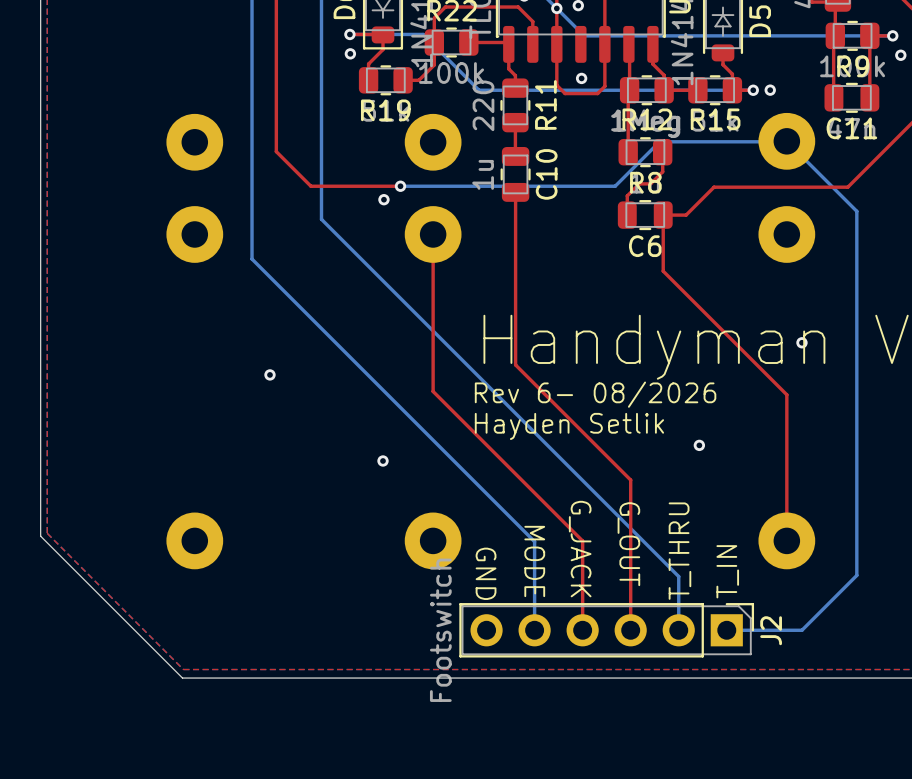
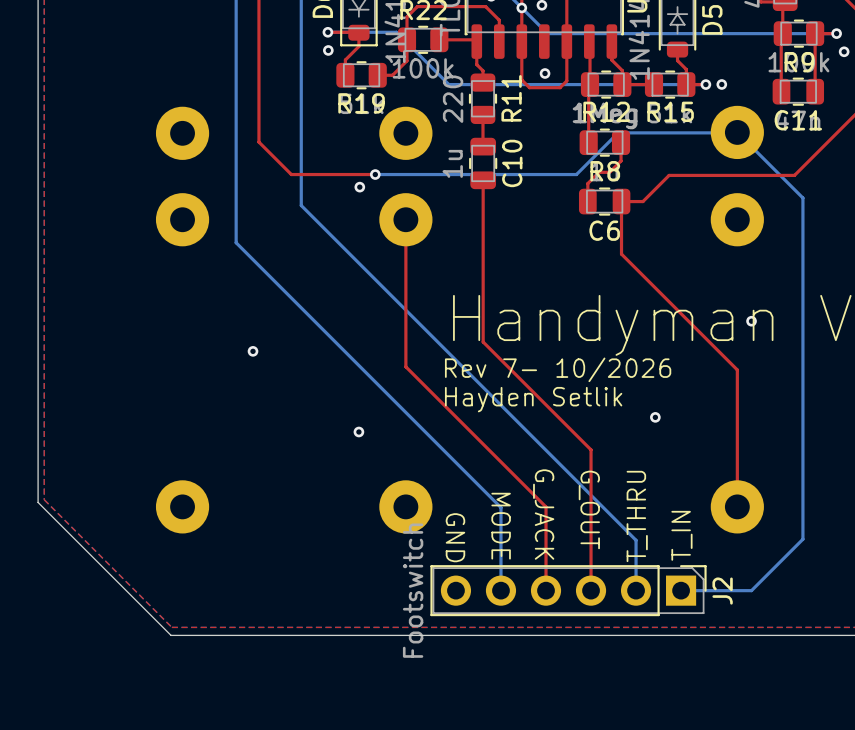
text: Rev 6- 08/2026 (595, 394) -> Rev 7- 10/2026 (558, 369)

